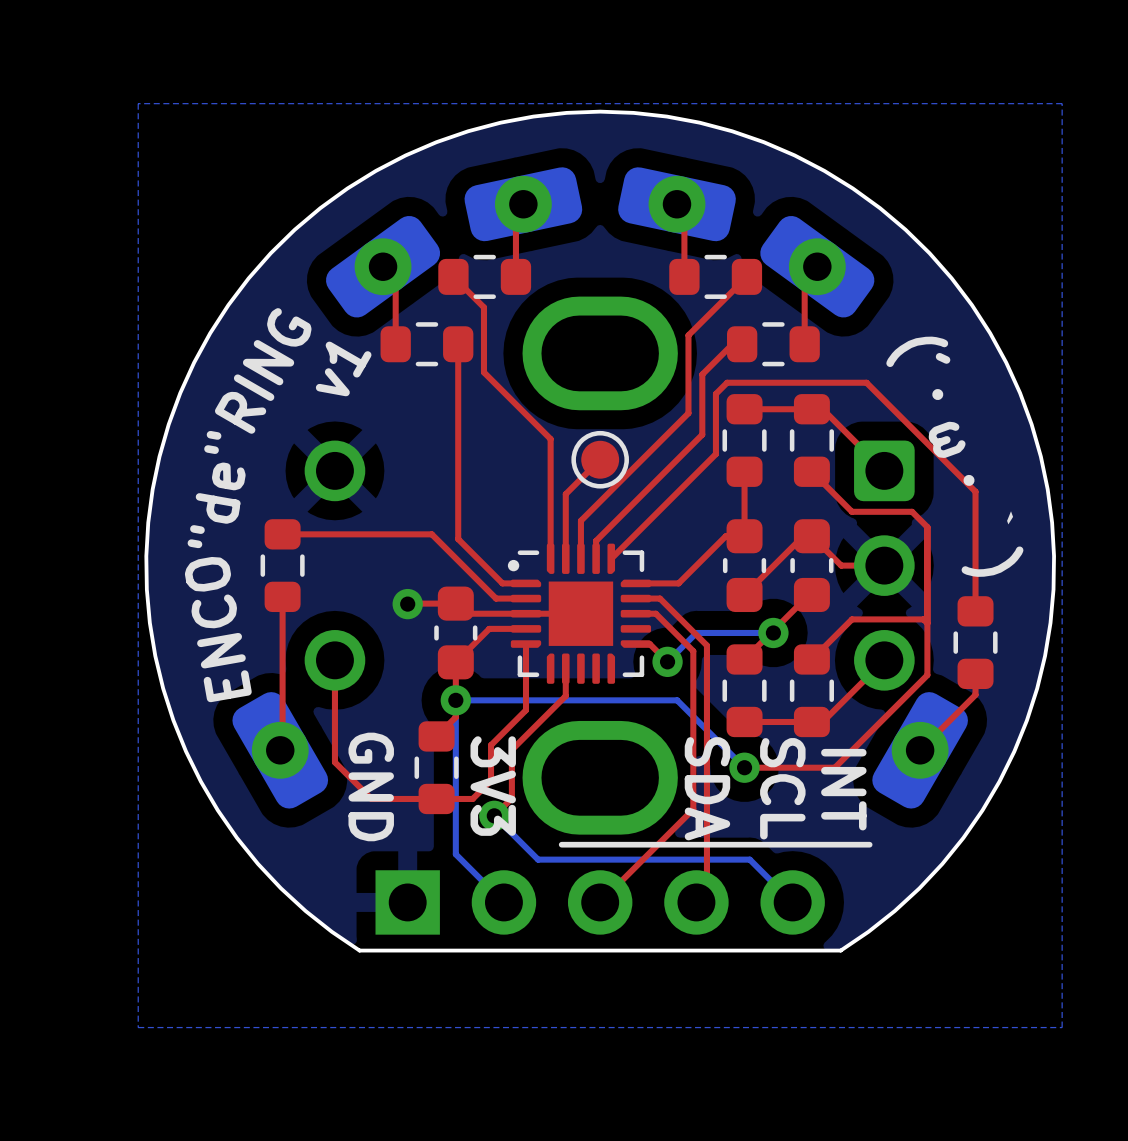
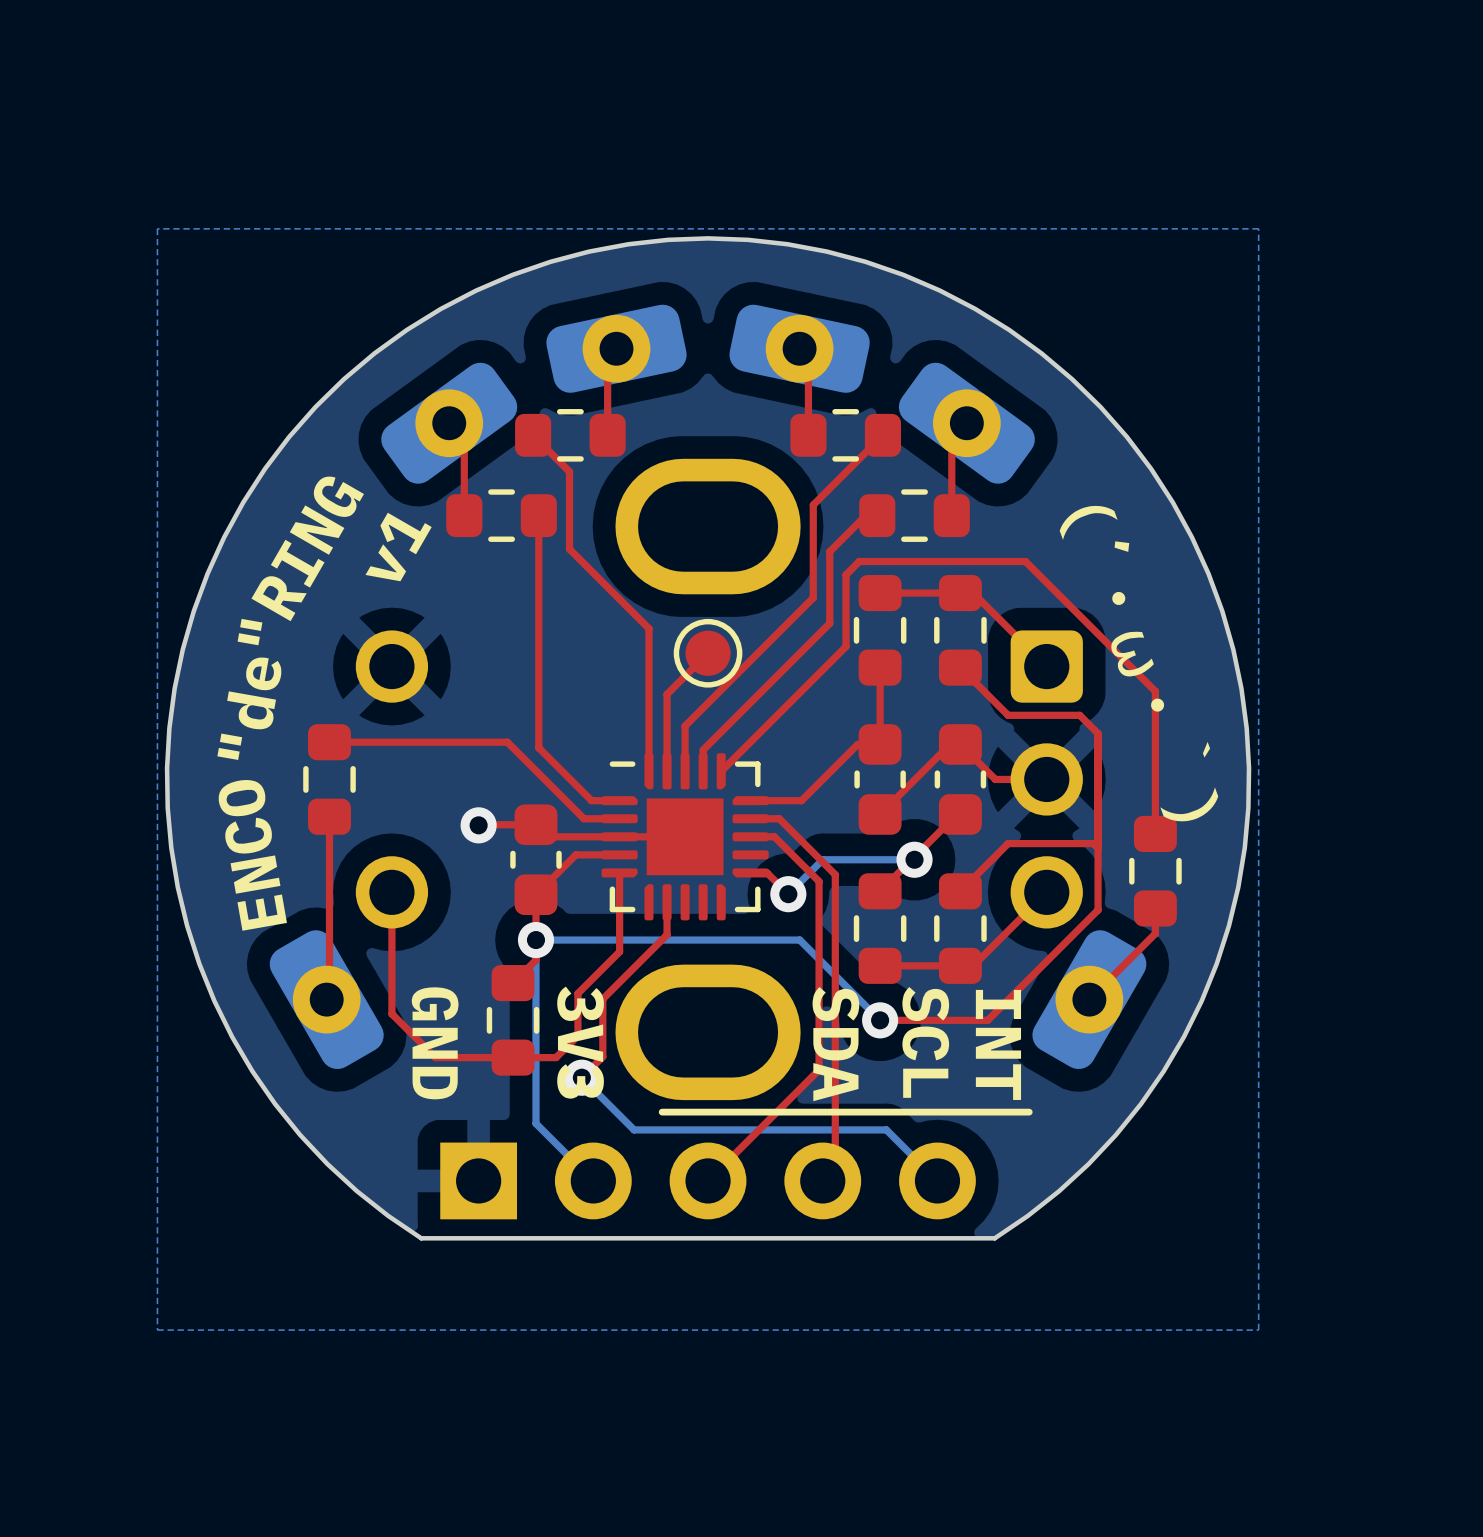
drawing: [507, 559, 520, 572] -> none

